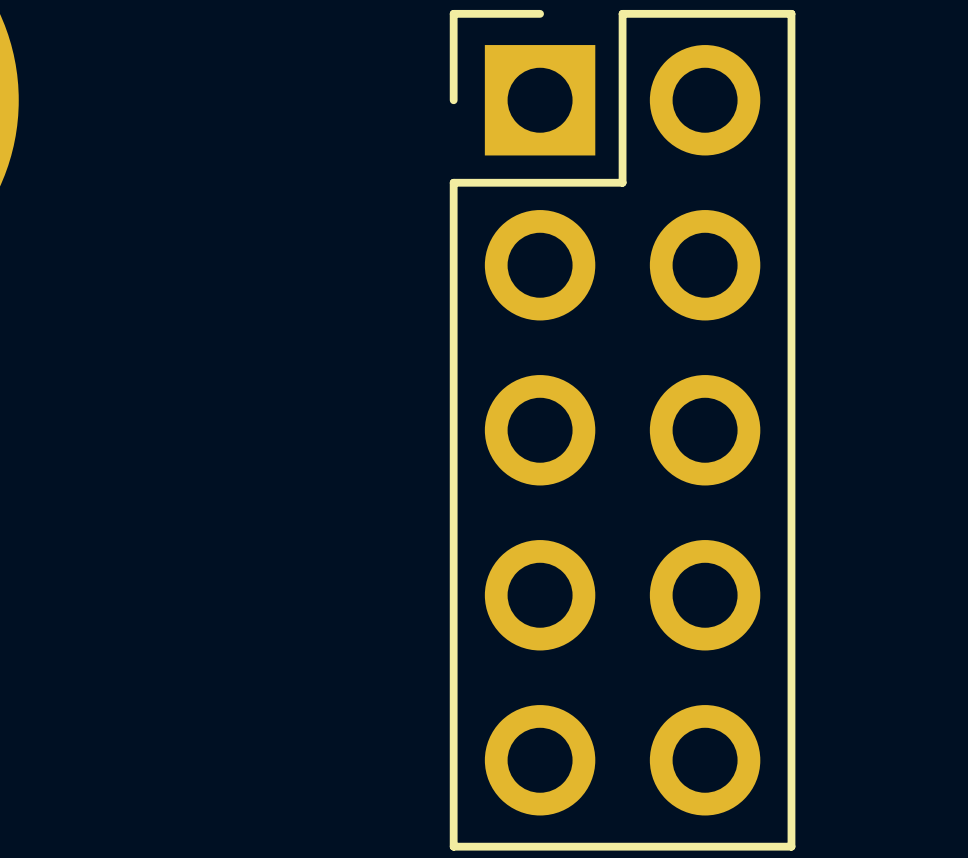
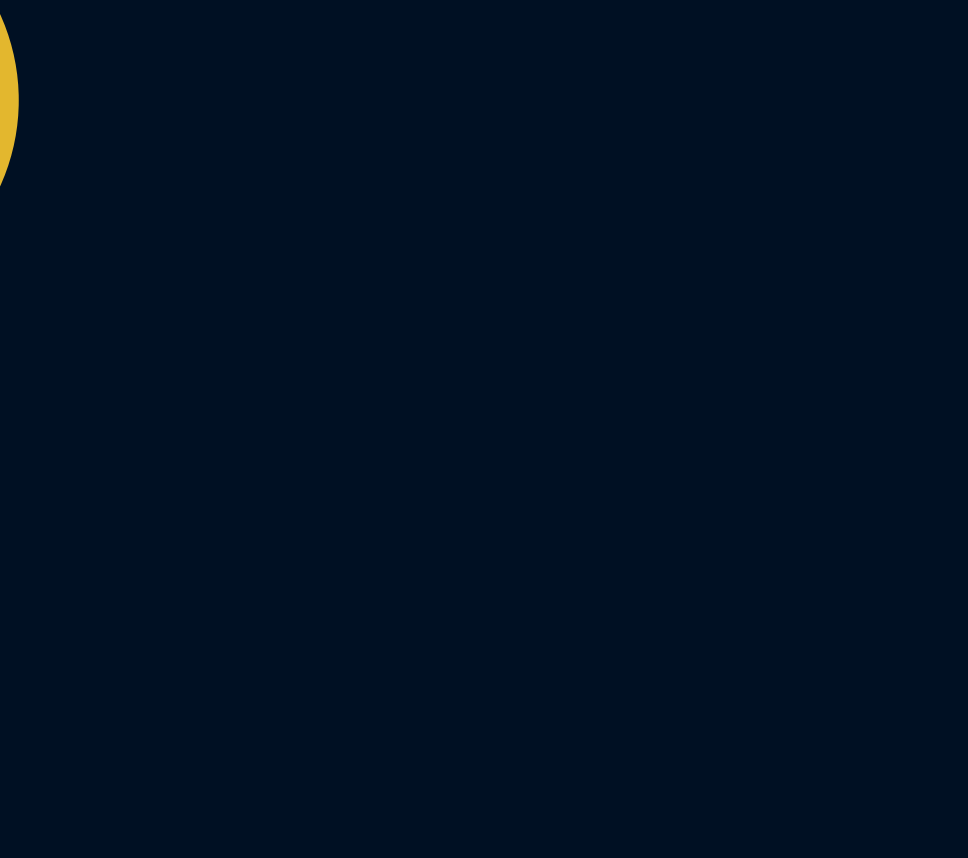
part: (622, 430) -> none

